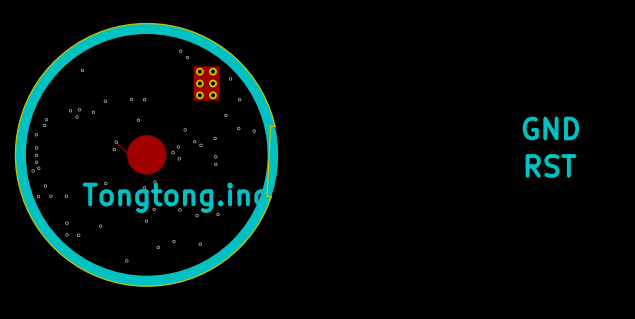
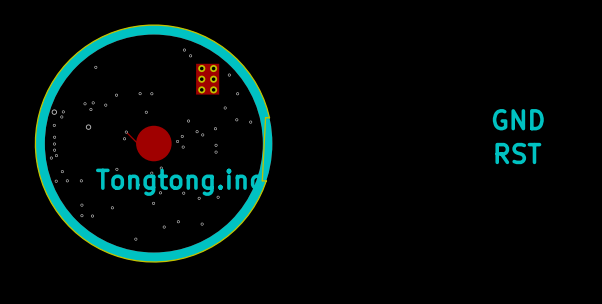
via: none -> (54, 112)
via: none -> (88, 127)

